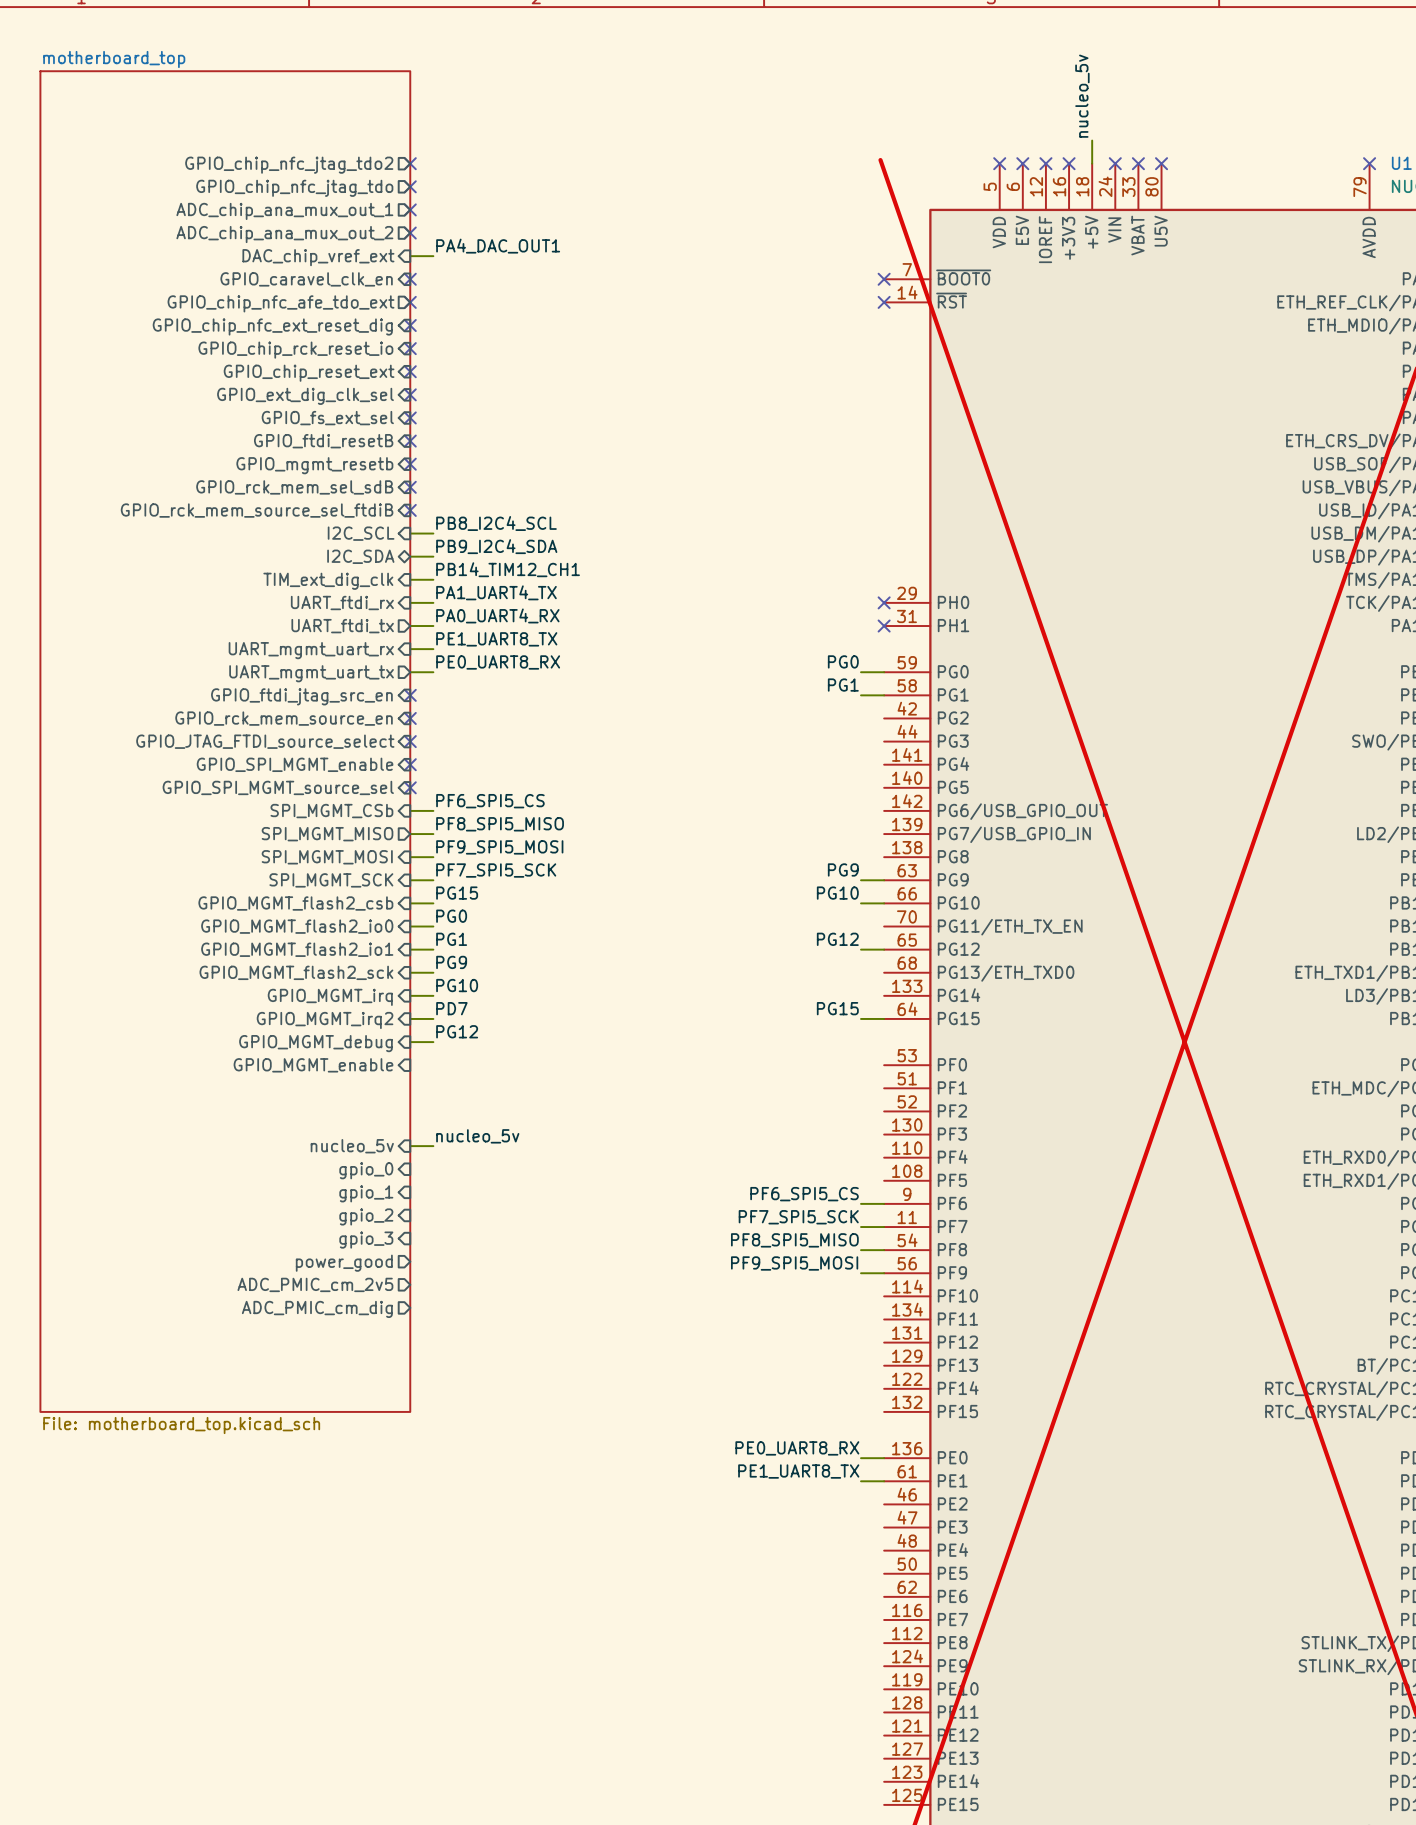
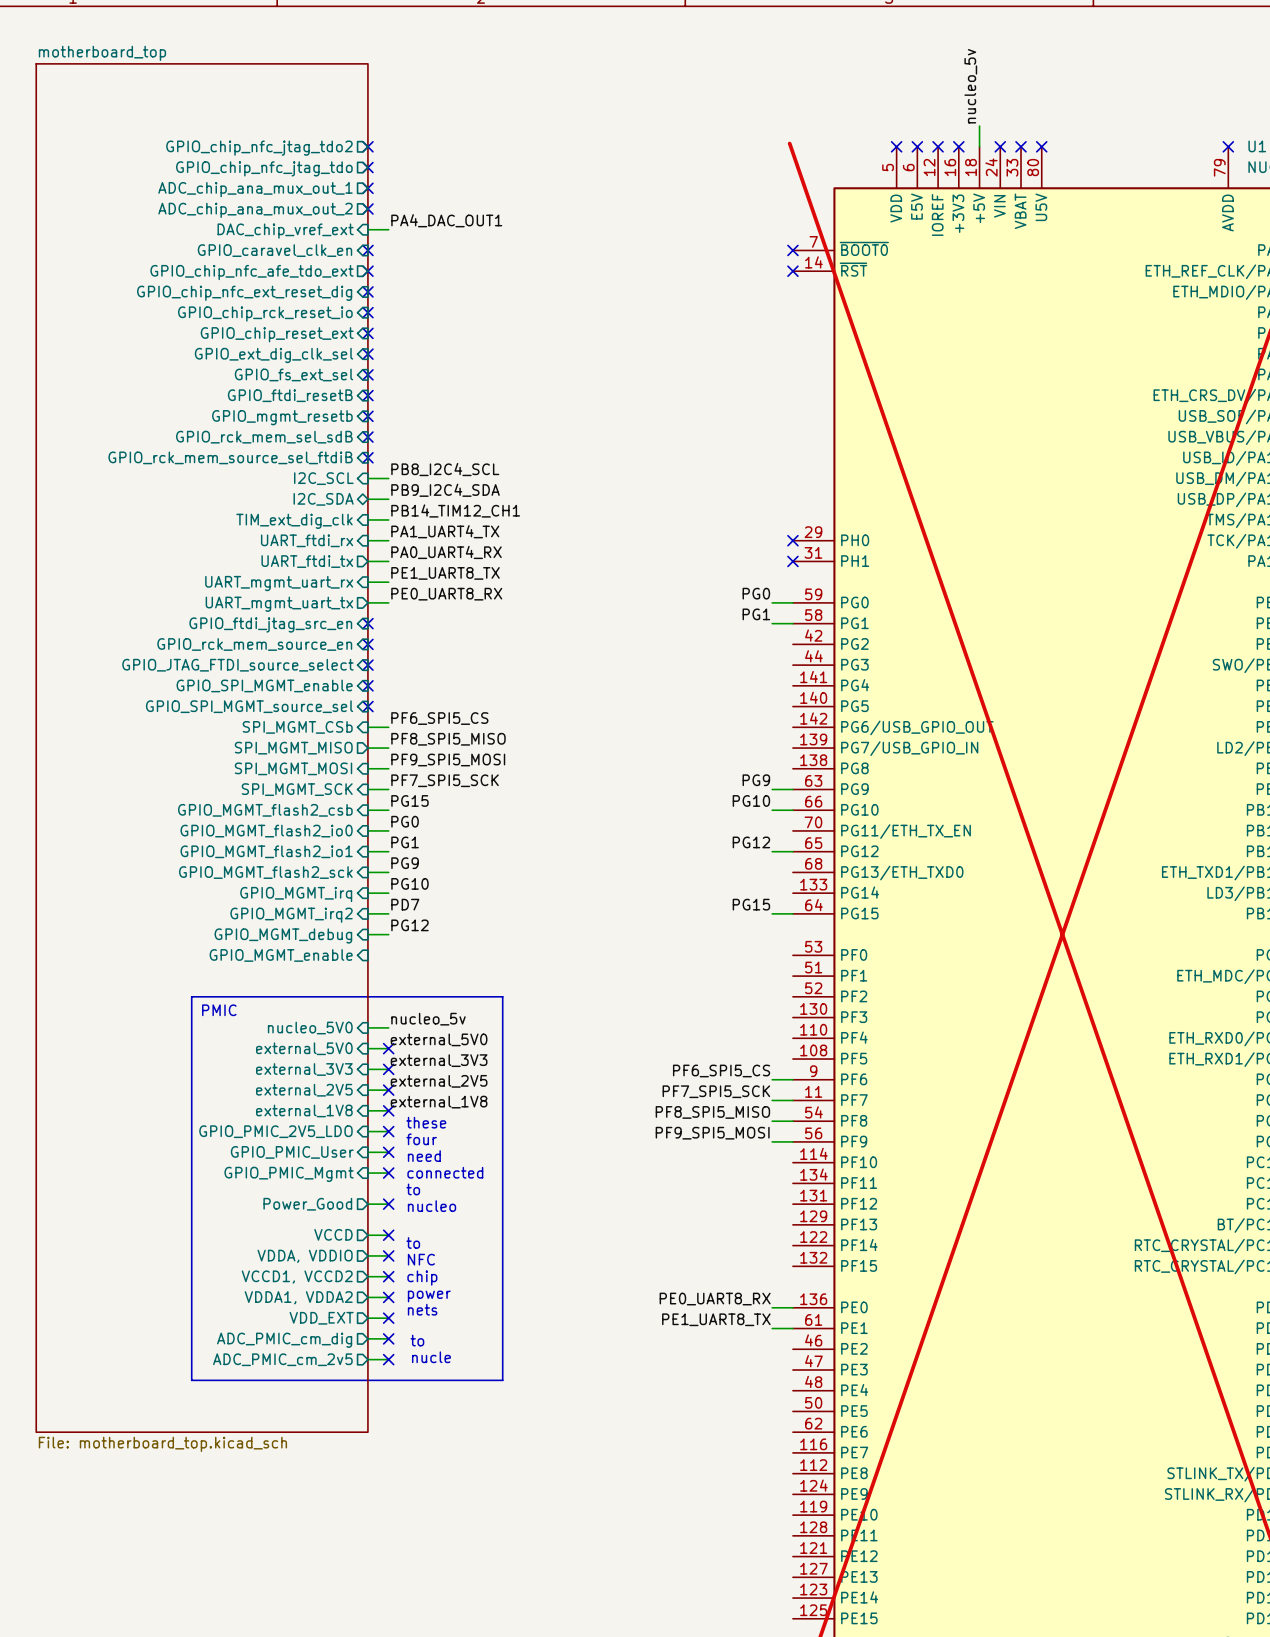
sheet motherboard_top: File: motherboard_top.kicad_sch (225, 741) -> none
sheet motherboard_top: none -> File: motherboard_top.kicad_sch (202, 748)
line: none -> (191, 996) (502, 996) (502, 1380) (191, 1380) (191, 996)
text: none -> PMIC (219, 1010)
sheet pin: nucleo_5v (352, 1146) -> nucleo_5V0 (310, 1028)
label: none -> external_5V0 (439, 1039)
wire: none -> (367, 1048) (388, 1048)
no-connect mark: none -> (388, 1048)
sheet pin: gpio_0 (366, 1170) -> external_5V0 (304, 1048)
label: none -> external_3V3 (439, 1060)
wire: none -> (367, 1069) (388, 1069)
no-connect mark: none -> (388, 1069)
sheet pin: gpio_1 (366, 1193) -> external_3V3 (304, 1069)
label: none -> external_2V5 (439, 1081)
wire: none -> (367, 1090) (388, 1090)
no-connect mark: none -> (388, 1090)
sheet pin: gpio_2 (366, 1216) -> external_2V5 (304, 1090)
label: none -> external_1V8 (439, 1102)
wire: none -> (367, 1110) (388, 1110)
no-connect mark: none -> (388, 1110)
sheet pin: gpio_3 (366, 1240) -> external_1V8 (304, 1110)
text: none -> these (426, 1122)
wire: none -> (367, 1131) (388, 1131)
no-connect mark: none -> (388, 1131)
sheet pin shape: output (344, 1263) -> input (275, 1131)
sheet pin: power_good (344, 1263) -> GPIO_PMIC_2V5_LDO (275, 1131)
text: none -> four (421, 1139)
sheet pin shape: output (315, 1284) -> input (292, 1152)
sheet pin: ADC_PMIC_cm_2v5 (315, 1284) -> GPIO_PMIC_User (292, 1152)
wire: none -> (367, 1152) (388, 1152)
no-connect mark: none -> (388, 1152)
text: none -> need (424, 1156)
wire: none -> (367, 1173) (388, 1173)
no-connect mark: none -> (388, 1173)
text: none -> connected (445, 1172)
sheet pin shape: output (317, 1309) -> input (289, 1174)
sheet pin: ADC_PMIC_cm_dig (317, 1309) -> GPIO_PMIC_Mgmt (289, 1174)
text: none -> to (413, 1189)
sheet pin: none -> Power_Good (307, 1204)
wire: none -> (367, 1204) (388, 1204)
no-connect mark: none -> (388, 1204)
text: none -> nucleo (432, 1206)
sheet pin: none -> VCCD (333, 1234)
wire: none -> (367, 1235) (388, 1235)
no-connect mark: none -> (388, 1235)
text: none -> to (413, 1242)
sheet pin: none -> VDDA, VDDIO (305, 1256)
wire: none -> (367, 1255) (388, 1255)
no-connect mark: none -> (388, 1255)
text: none -> NFC (421, 1259)
sheet pin: none -> VCCD1, VCCD2 (297, 1277)
wire: none -> (367, 1276) (388, 1276)
no-connect mark: none -> (388, 1276)
text: none -> chip (422, 1278)
text: none -> power (429, 1296)
wire: none -> (367, 1297) (388, 1297)
no-connect mark: none -> (388, 1297)
sheet pin: none -> VDDA1, VDDA2 (298, 1297)
text: none -> nets (422, 1309)
sheet pin: none -> VDD_EXT (321, 1318)
wire: none -> (367, 1318) (388, 1318)
no-connect mark: none -> (388, 1318)
wire: none -> (367, 1338) (388, 1338)
no-connect mark: none -> (388, 1338)
sheet pin: none -> ADC_PMIC_cm_dig (284, 1340)
text: none -> to (417, 1340)
text: none -> nucle (431, 1357)
wire: none -> (367, 1359) (388, 1359)
no-connect mark: none -> (388, 1359)
sheet pin: none -> ADC_PMIC_cm_2v5 (282, 1359)

